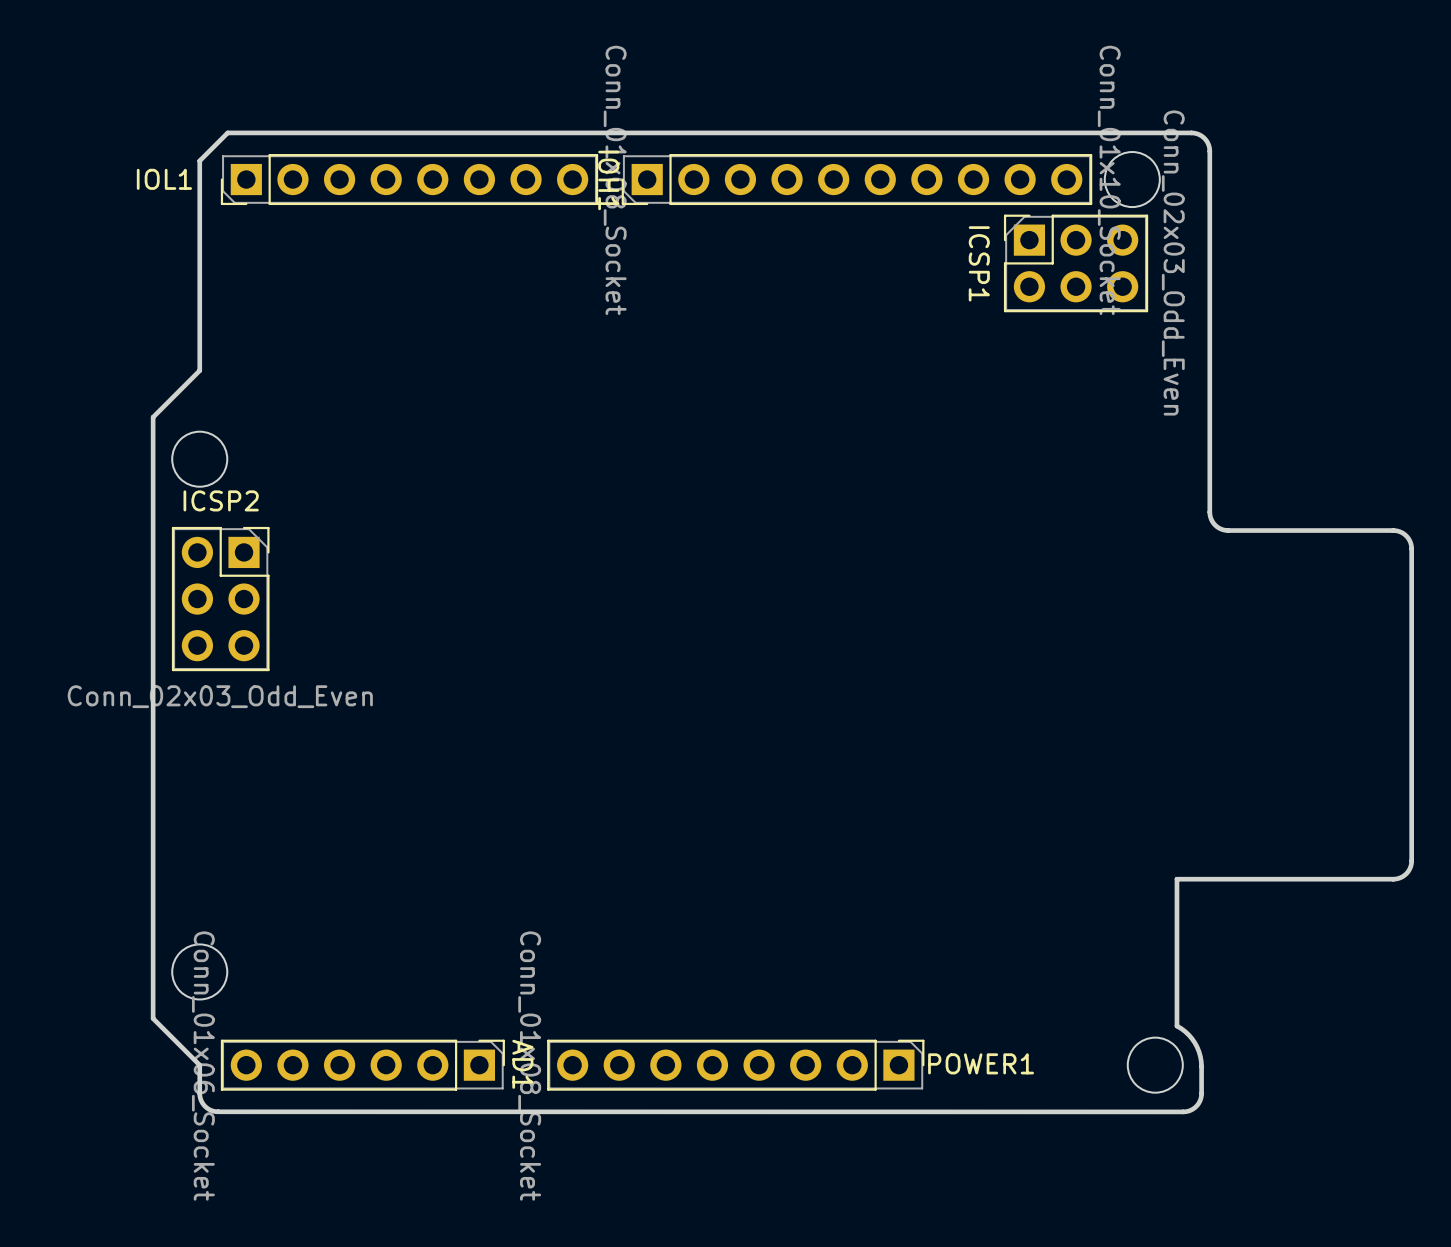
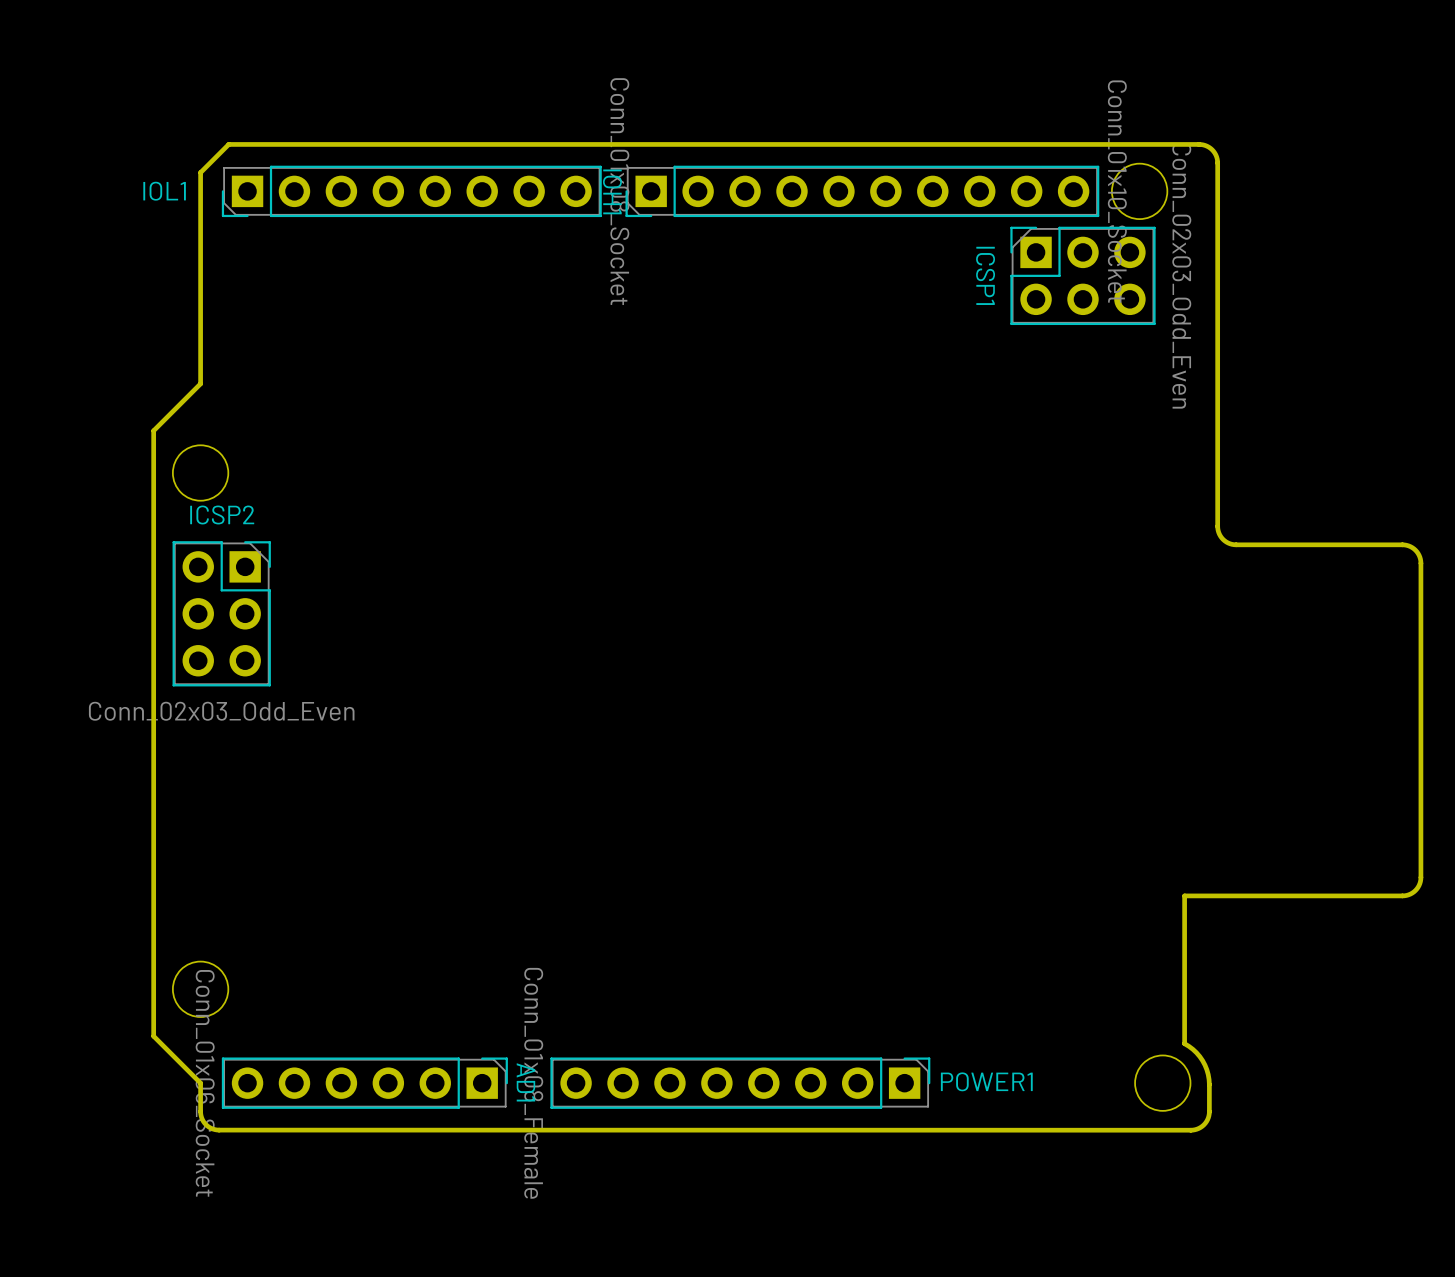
POWER1 value: Conn_01x08_Socket (529, 1066) -> Conn_01x08_Female (533, 1083)

